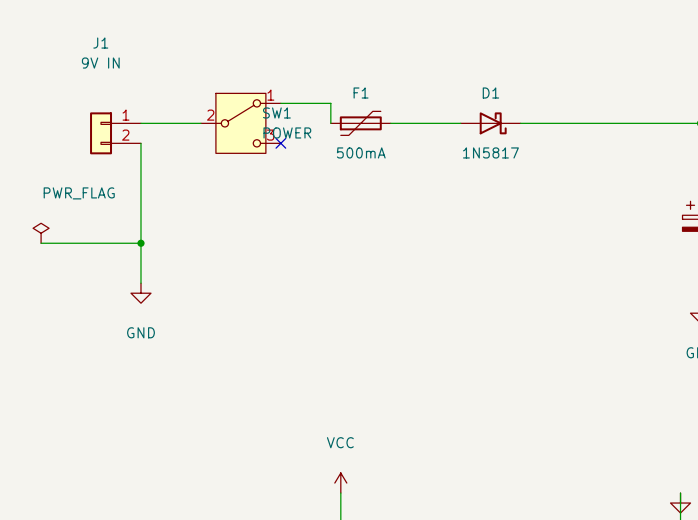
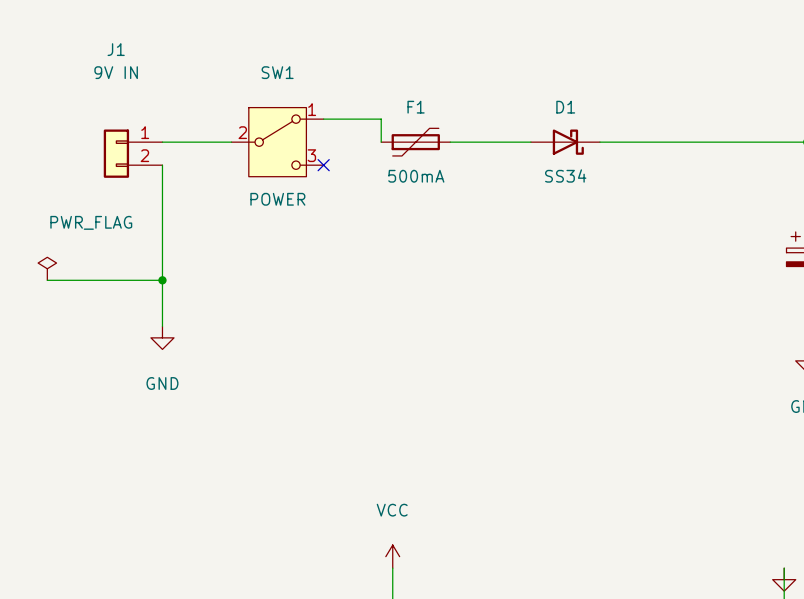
SW1 name position: SW1 (276, 112) -> SW1 (277, 72)
SW1 value position: POWER (287, 132) -> POWER (277, 199)
D1 value: 1N5817 (490, 152) -> SS34 (565, 175)

